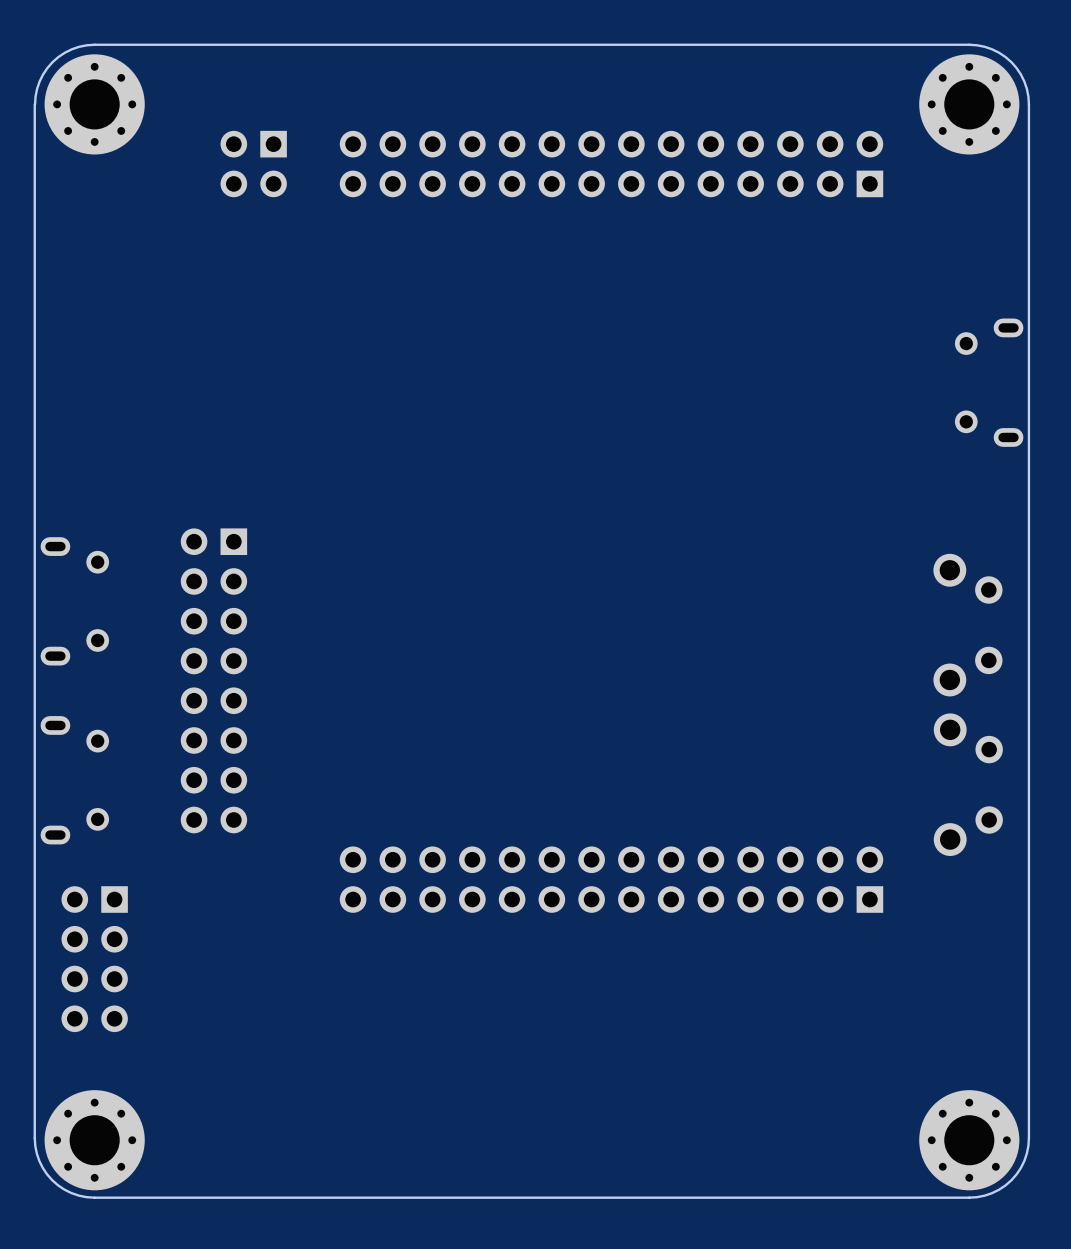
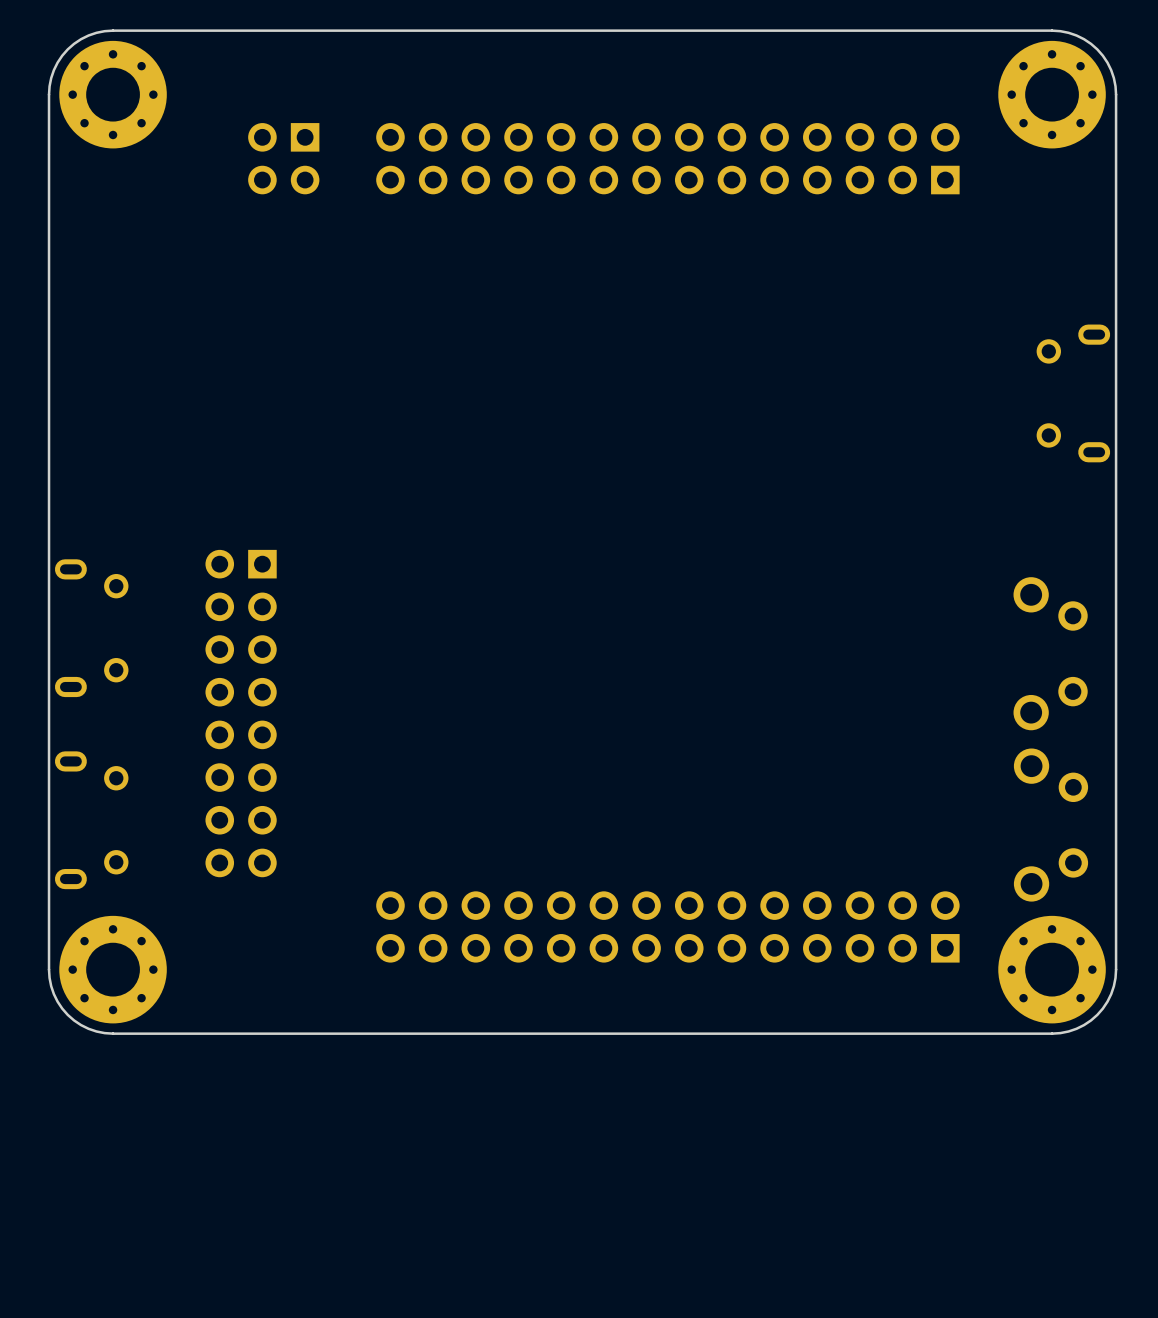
board edge: (34, 104) (34, 1138) (39, 1160) (52, 1180) (71, 1193) (94, 1197) -> (49, 94) (49, 969) (51, 986) (57, 1001) (74, 1020) (88, 1028) (113, 1033) (1052, 1033) (1076, 1028) (1097, 1014) (1111, 994) (1116, 969)
board edge: (1028, 919) (1028, 1145) (1024, 1160) (1011, 1180) (999, 1189) (984, 1195) (969, 1197) (94, 1197) -> none
part: (94, 959) -> none
part position: (94, 1140) -> (113, 969)
part position: (969, 1140) -> (1052, 969)

